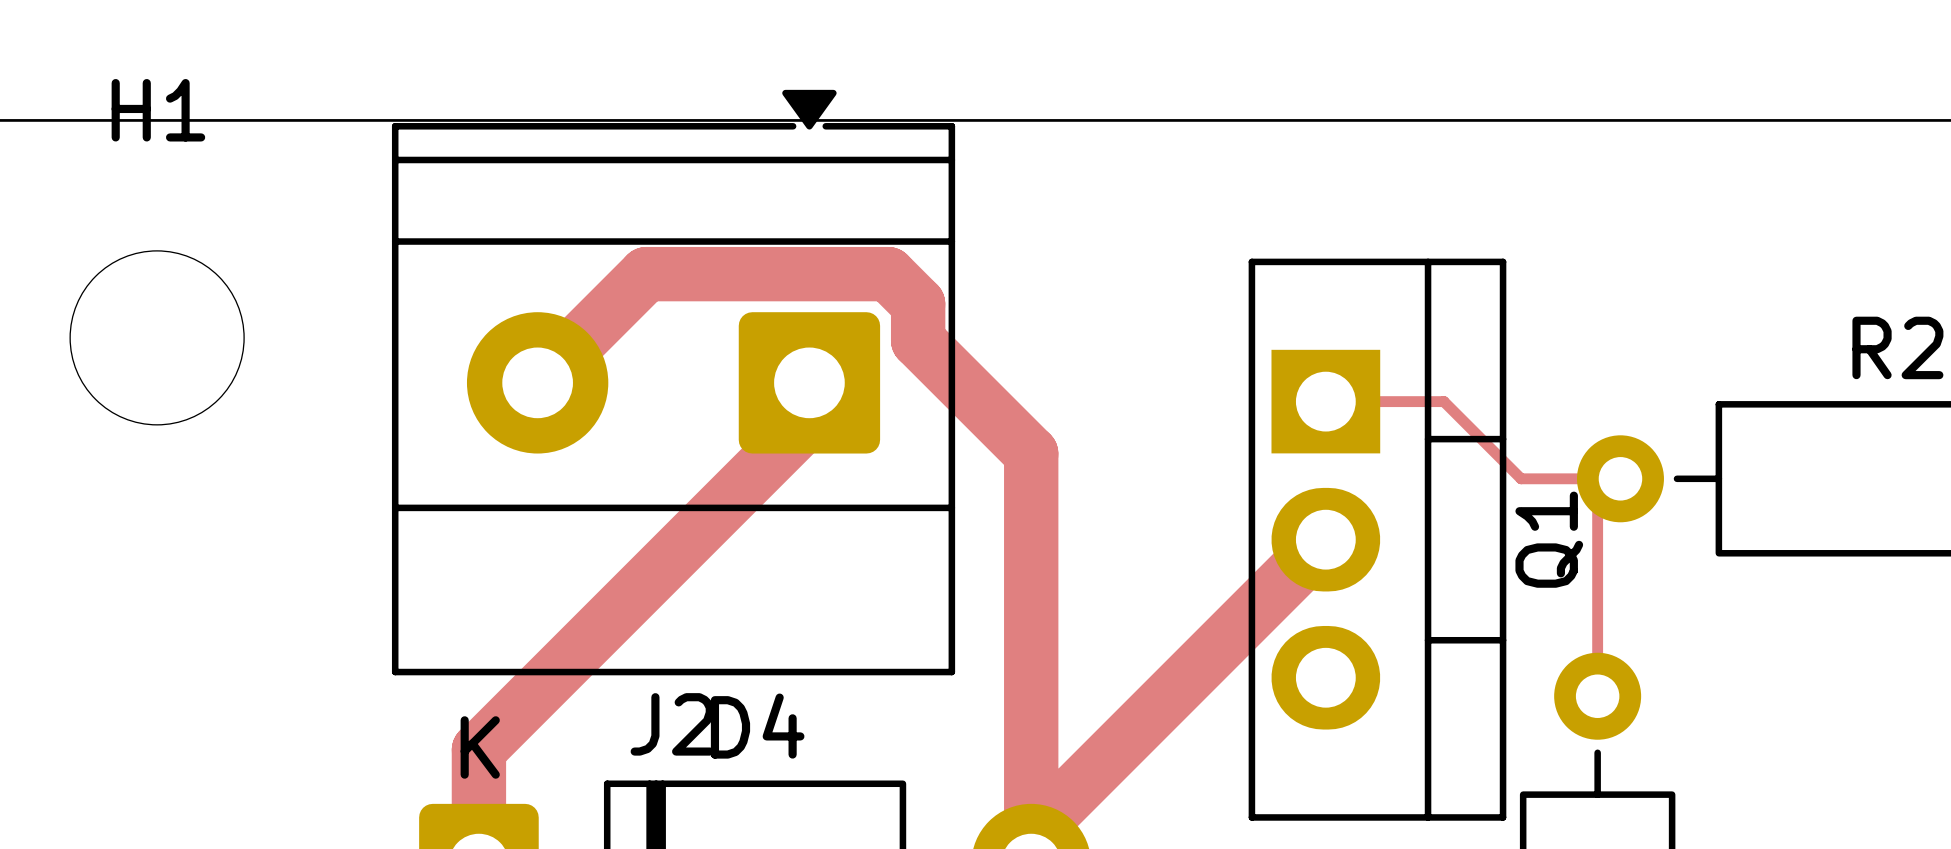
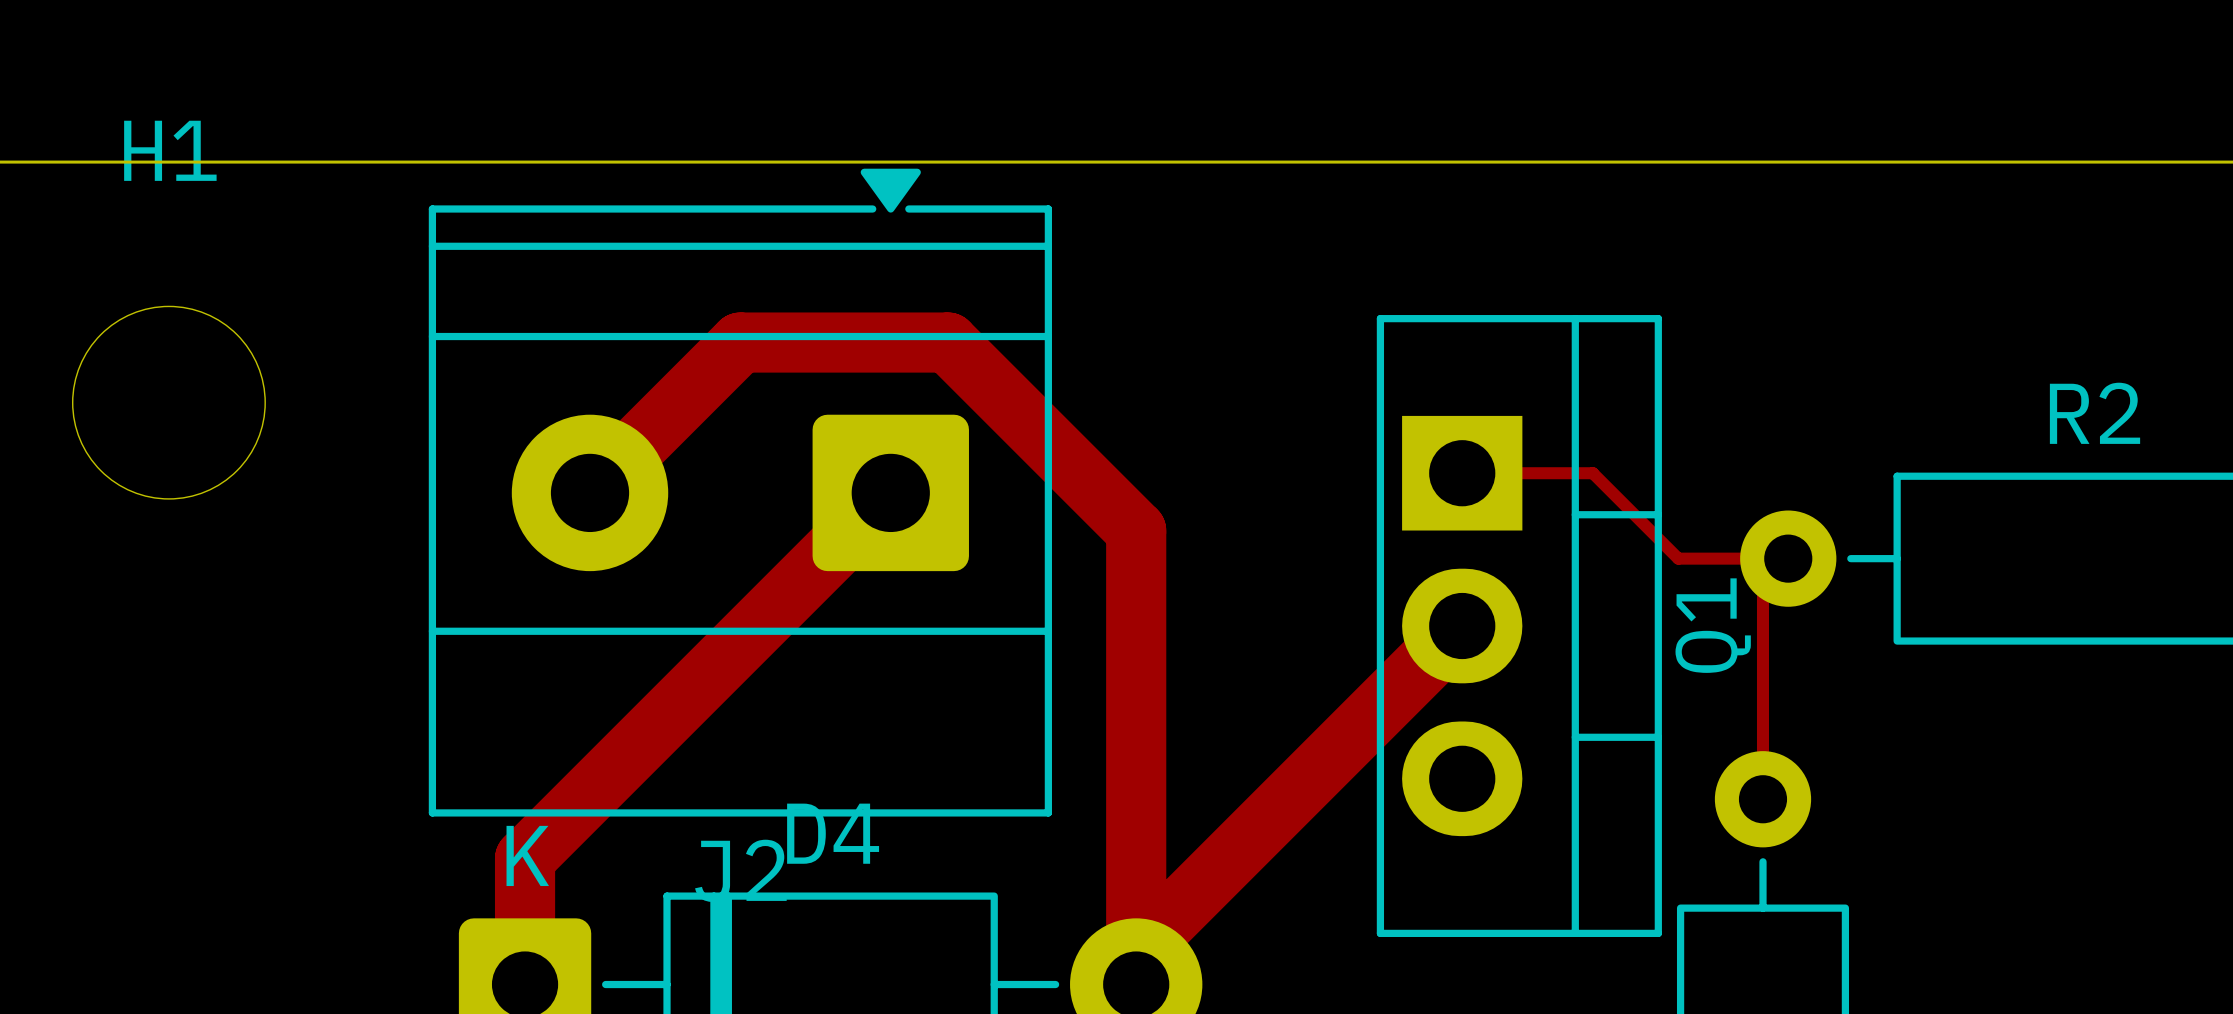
track: (918, 340) (918, 304) (888, 274) (646, 274) (537, 382) -> (1011, 405) (947, 342) (740, 342) (590, 492)
J2 position: (673, 382) -> (740, 492)

